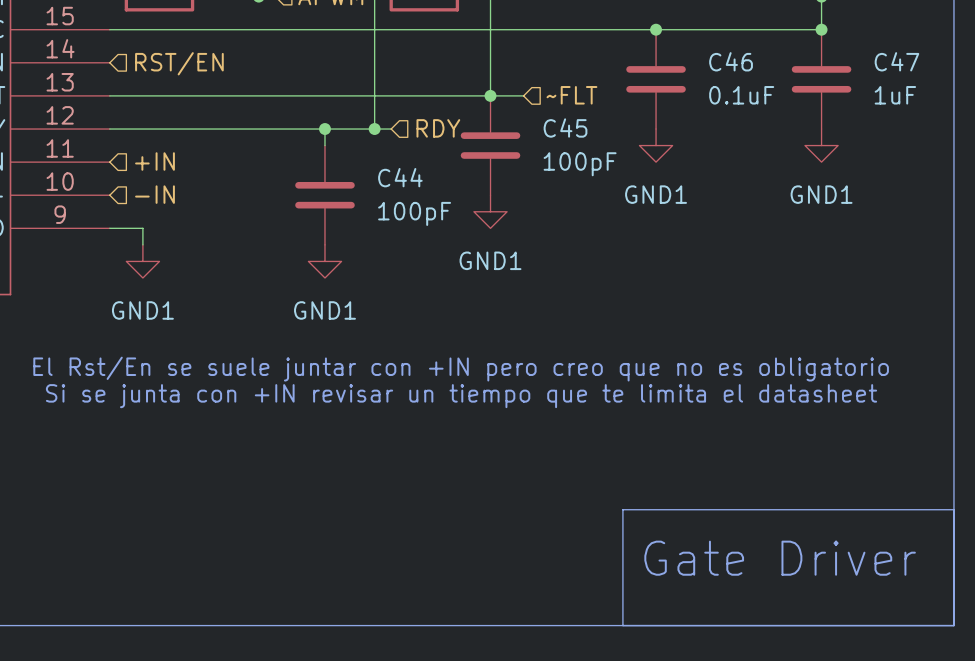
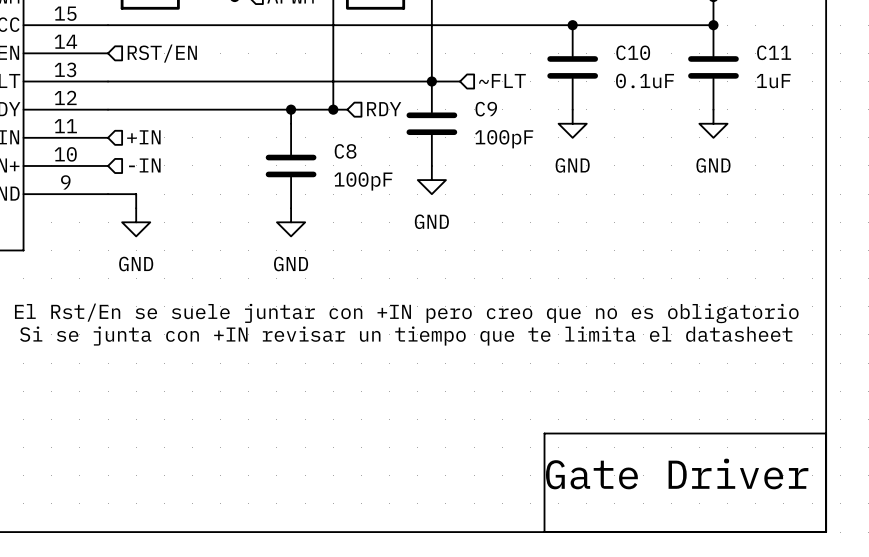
C46 name: C46 (731, 61) -> C10 (633, 52)
C47 name: C47 (896, 61) -> C11 (774, 52)
C45 name: C45 (565, 128) -> C9 (486, 109)
power symbol: GND1 (656, 145) -> GND (572, 123)
power symbol: GND1 (821, 145) -> GND (713, 123)
C44 name: C44 (400, 177) -> C8 (345, 151)
power symbol: GND1 (490, 211) -> GND (431, 180)
power symbol: GND1 (142, 261) -> GND (136, 222)
power symbol: GND1 (324, 261) -> GND (291, 222)

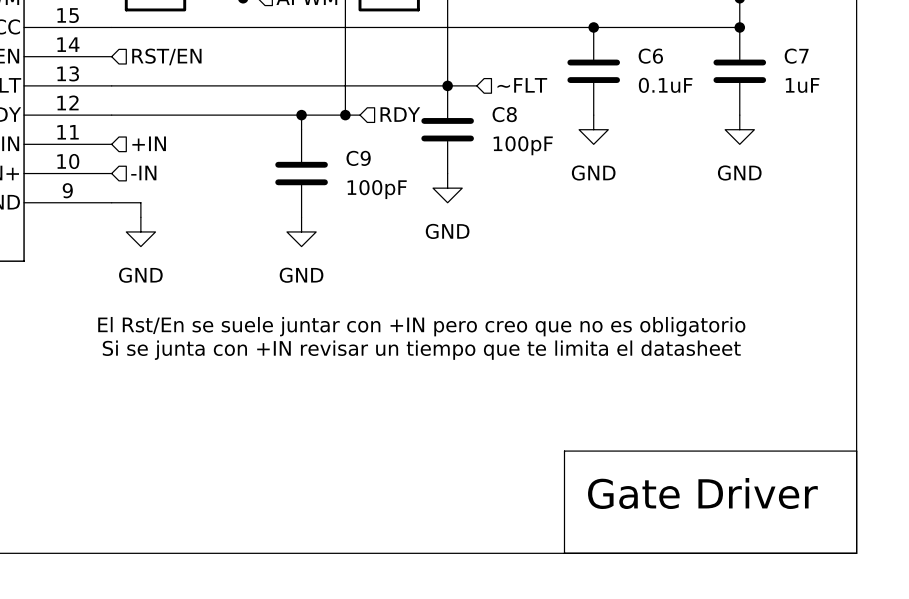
C10 name: C10 (633, 52) -> C6 (650, 56)
C11 name: C11 (774, 52) -> C7 (796, 56)
C9 name: C9 (486, 109) -> C8 (504, 114)
C8 name: C8 (345, 151) -> C9 (358, 158)

